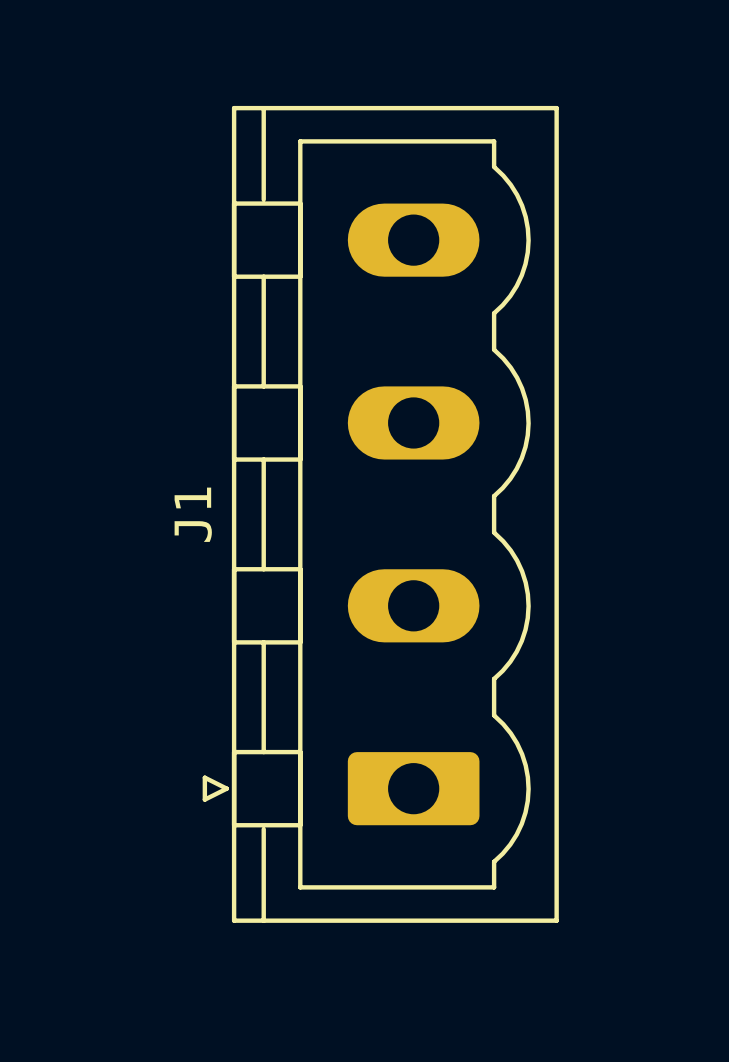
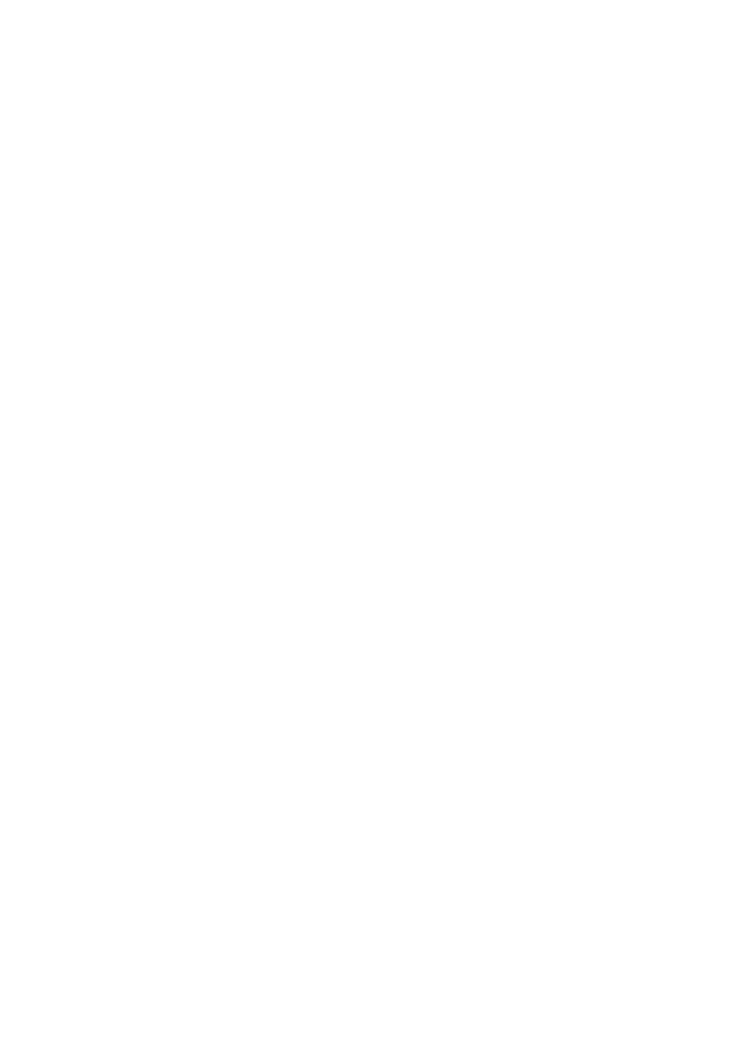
J1: (380, 514) -> none

